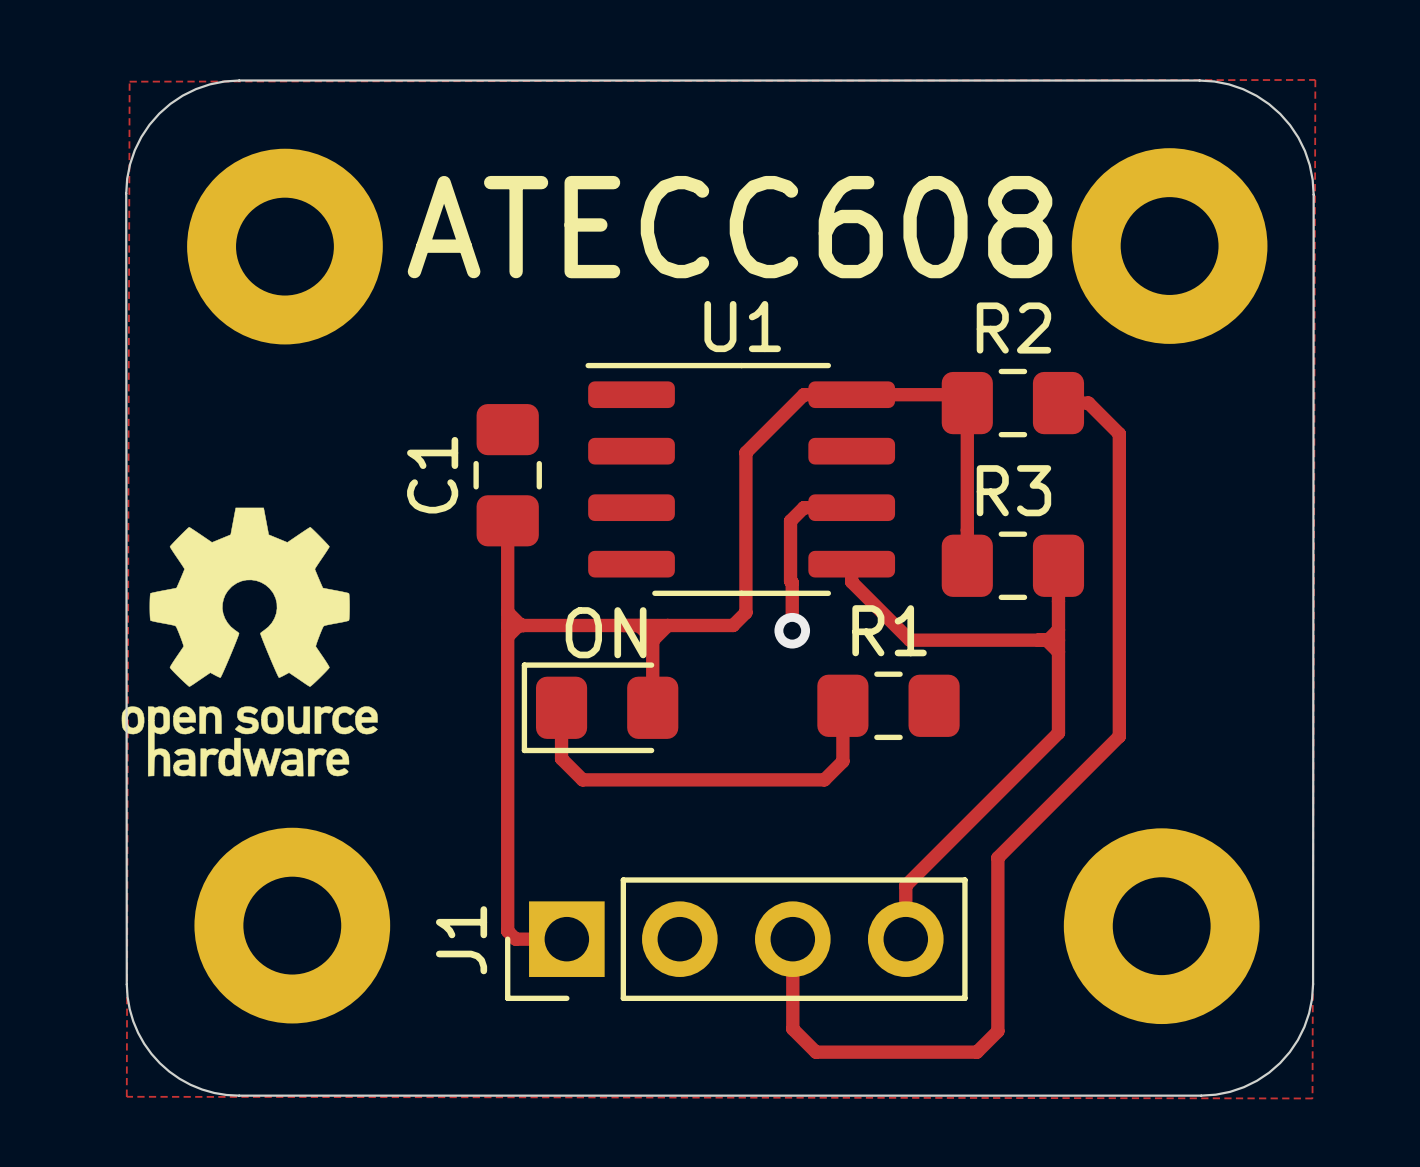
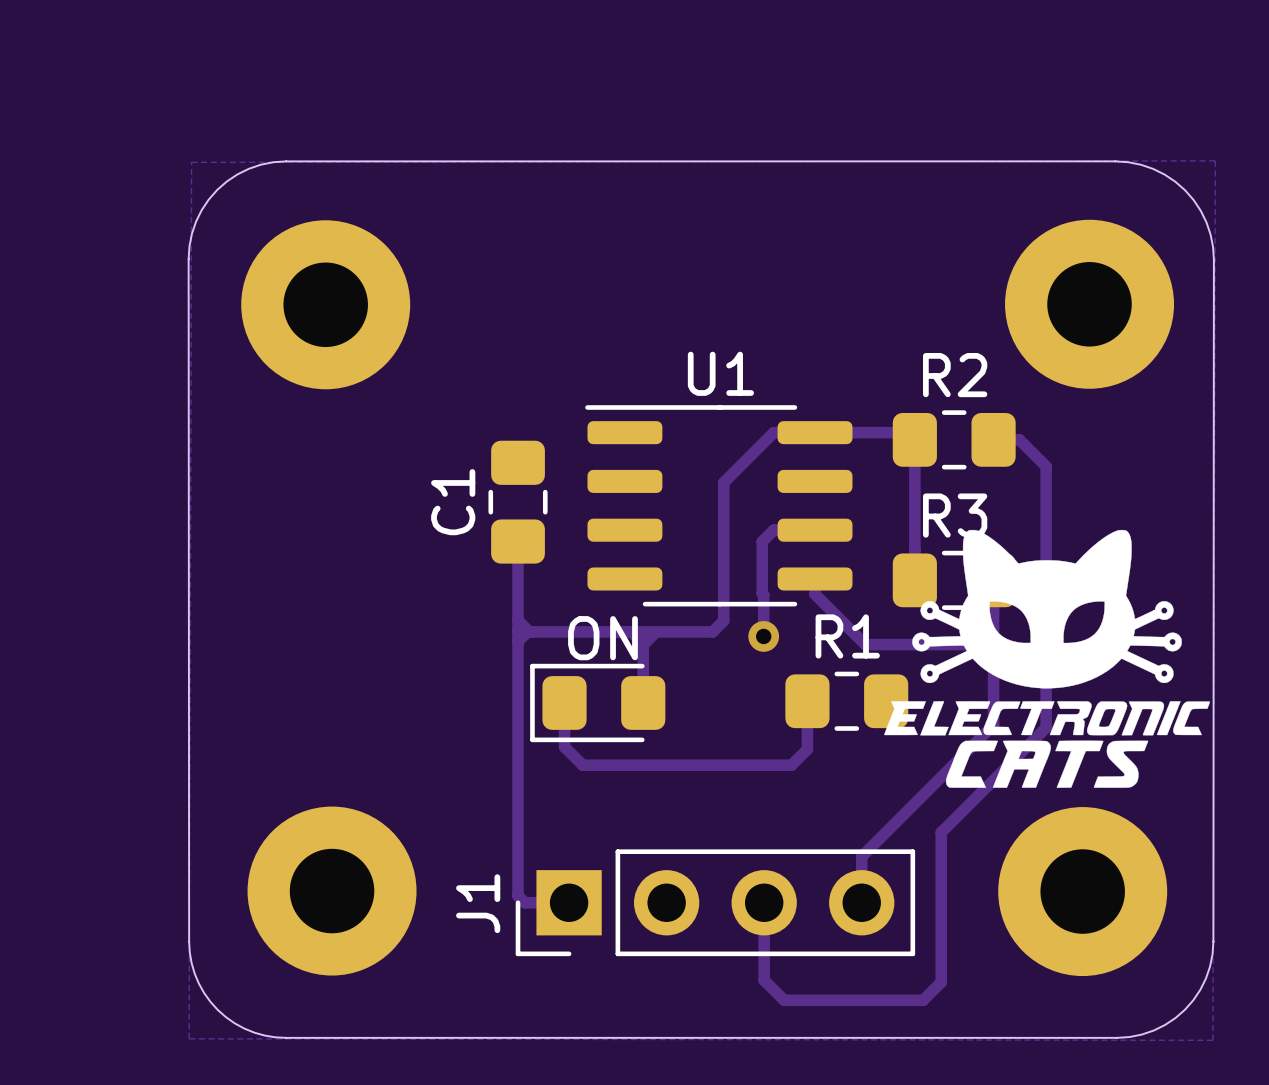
text: ATECC608 (730, 227) -> none
drawing: [121, 507, 378, 777] -> none
drawing: none -> [884, 529, 1210, 788]

